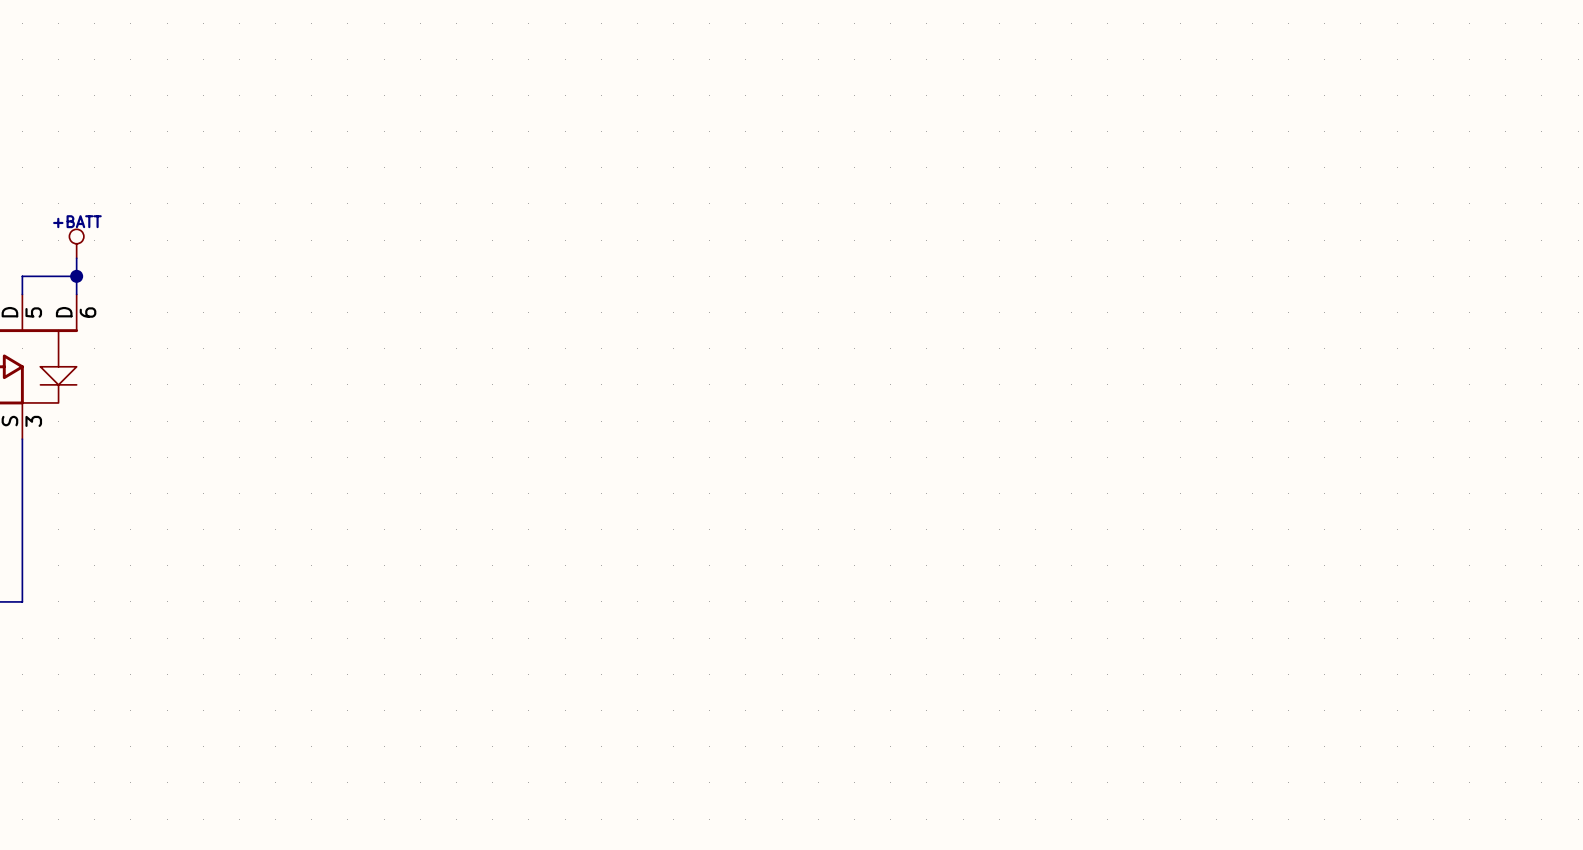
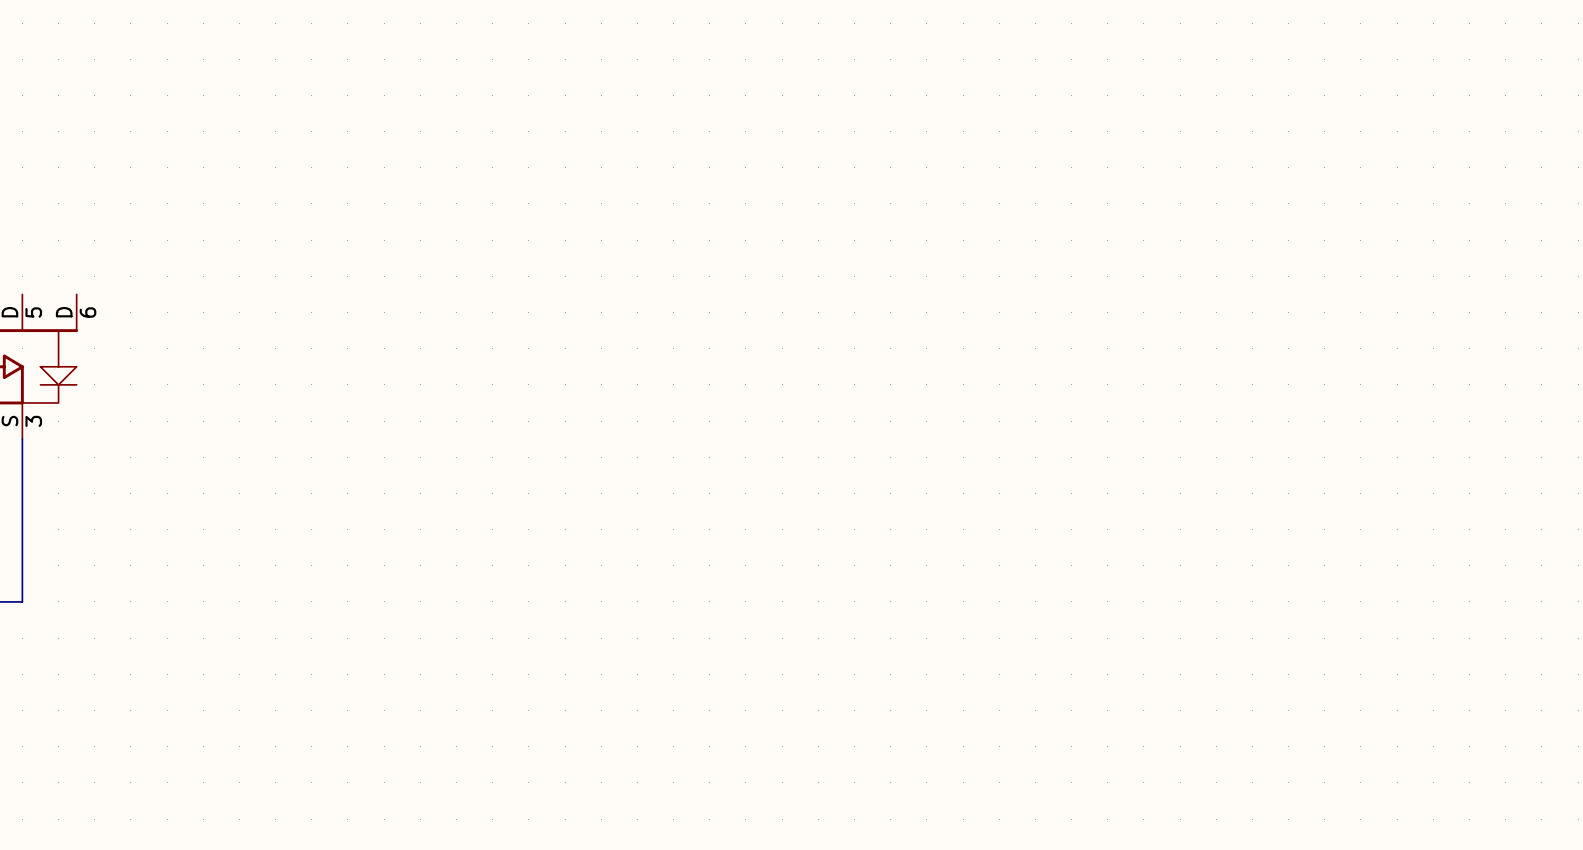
power symbol: +BATT (76, 243) -> none
wire: (76, 258) (76, 294) -> none
wire: (76, 276) (22, 276) (22, 294) -> none
junction: (76, 276) -> none

